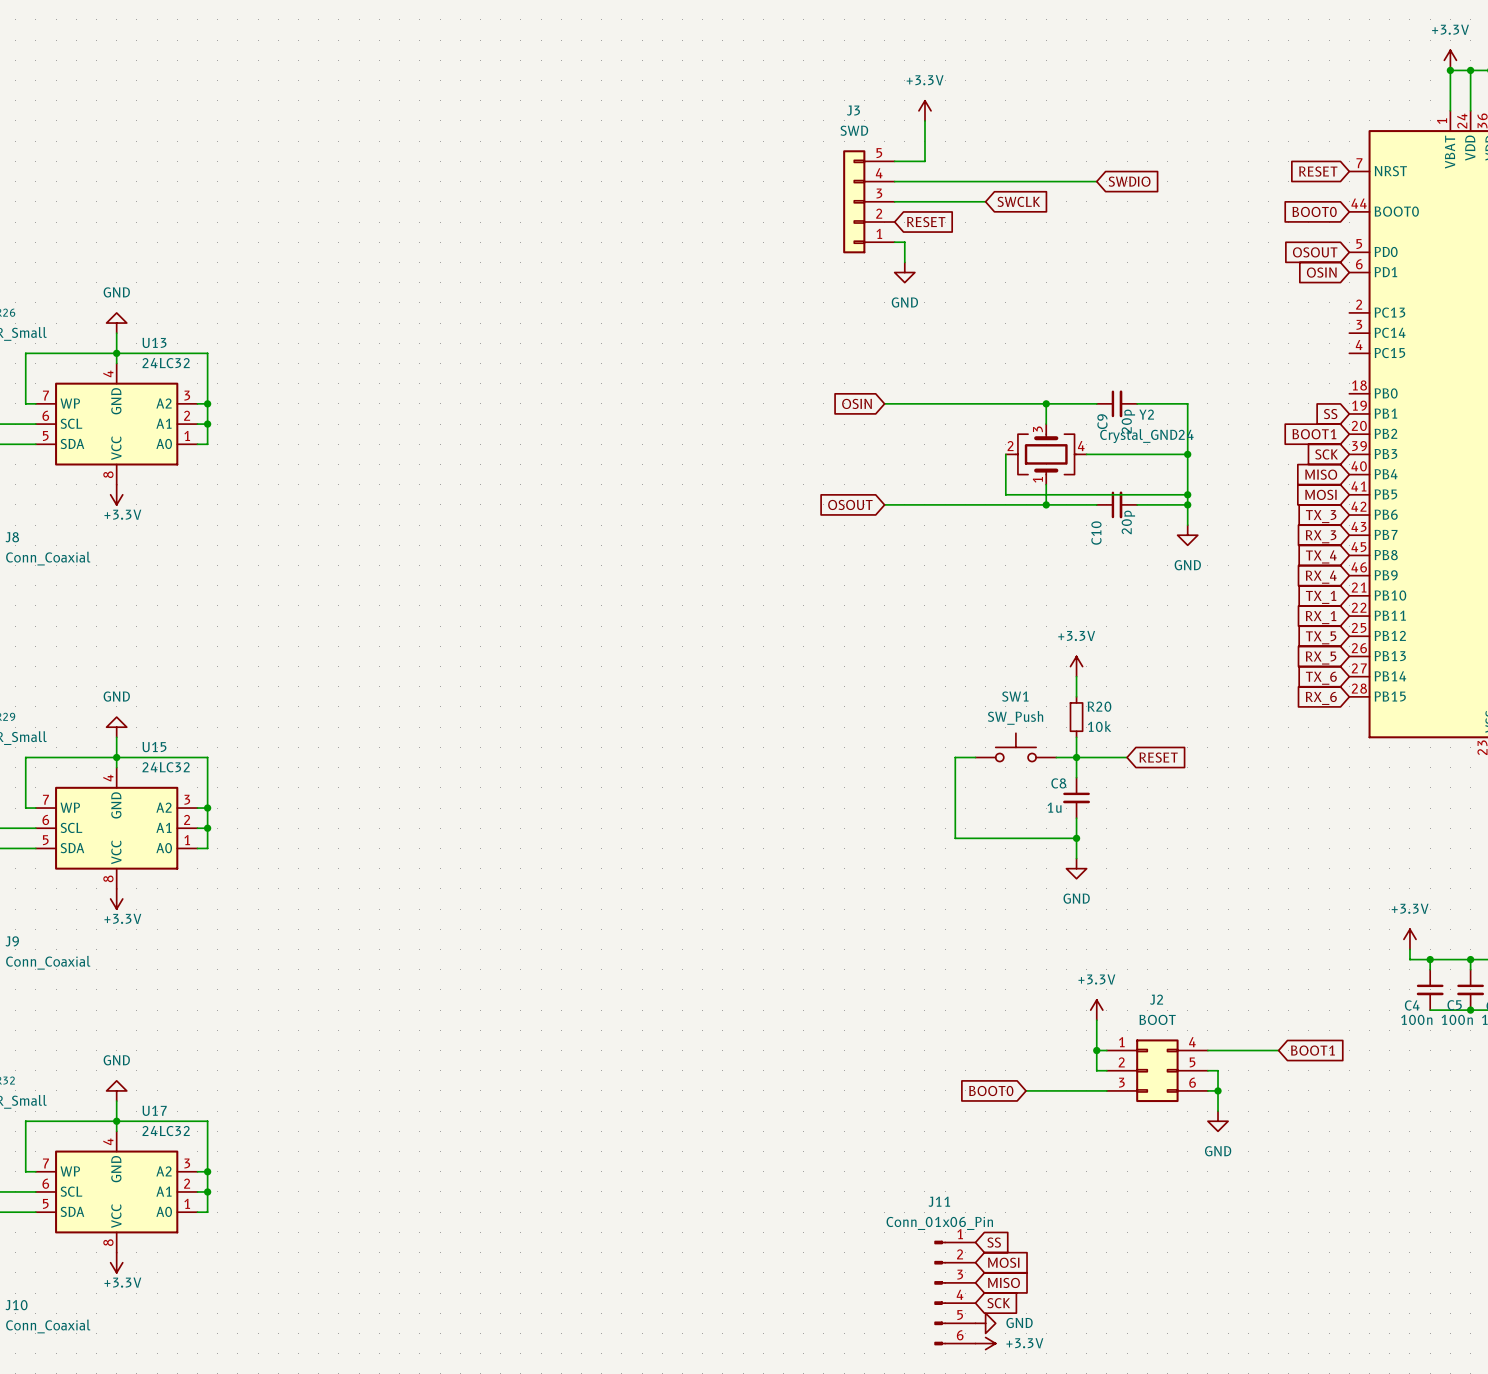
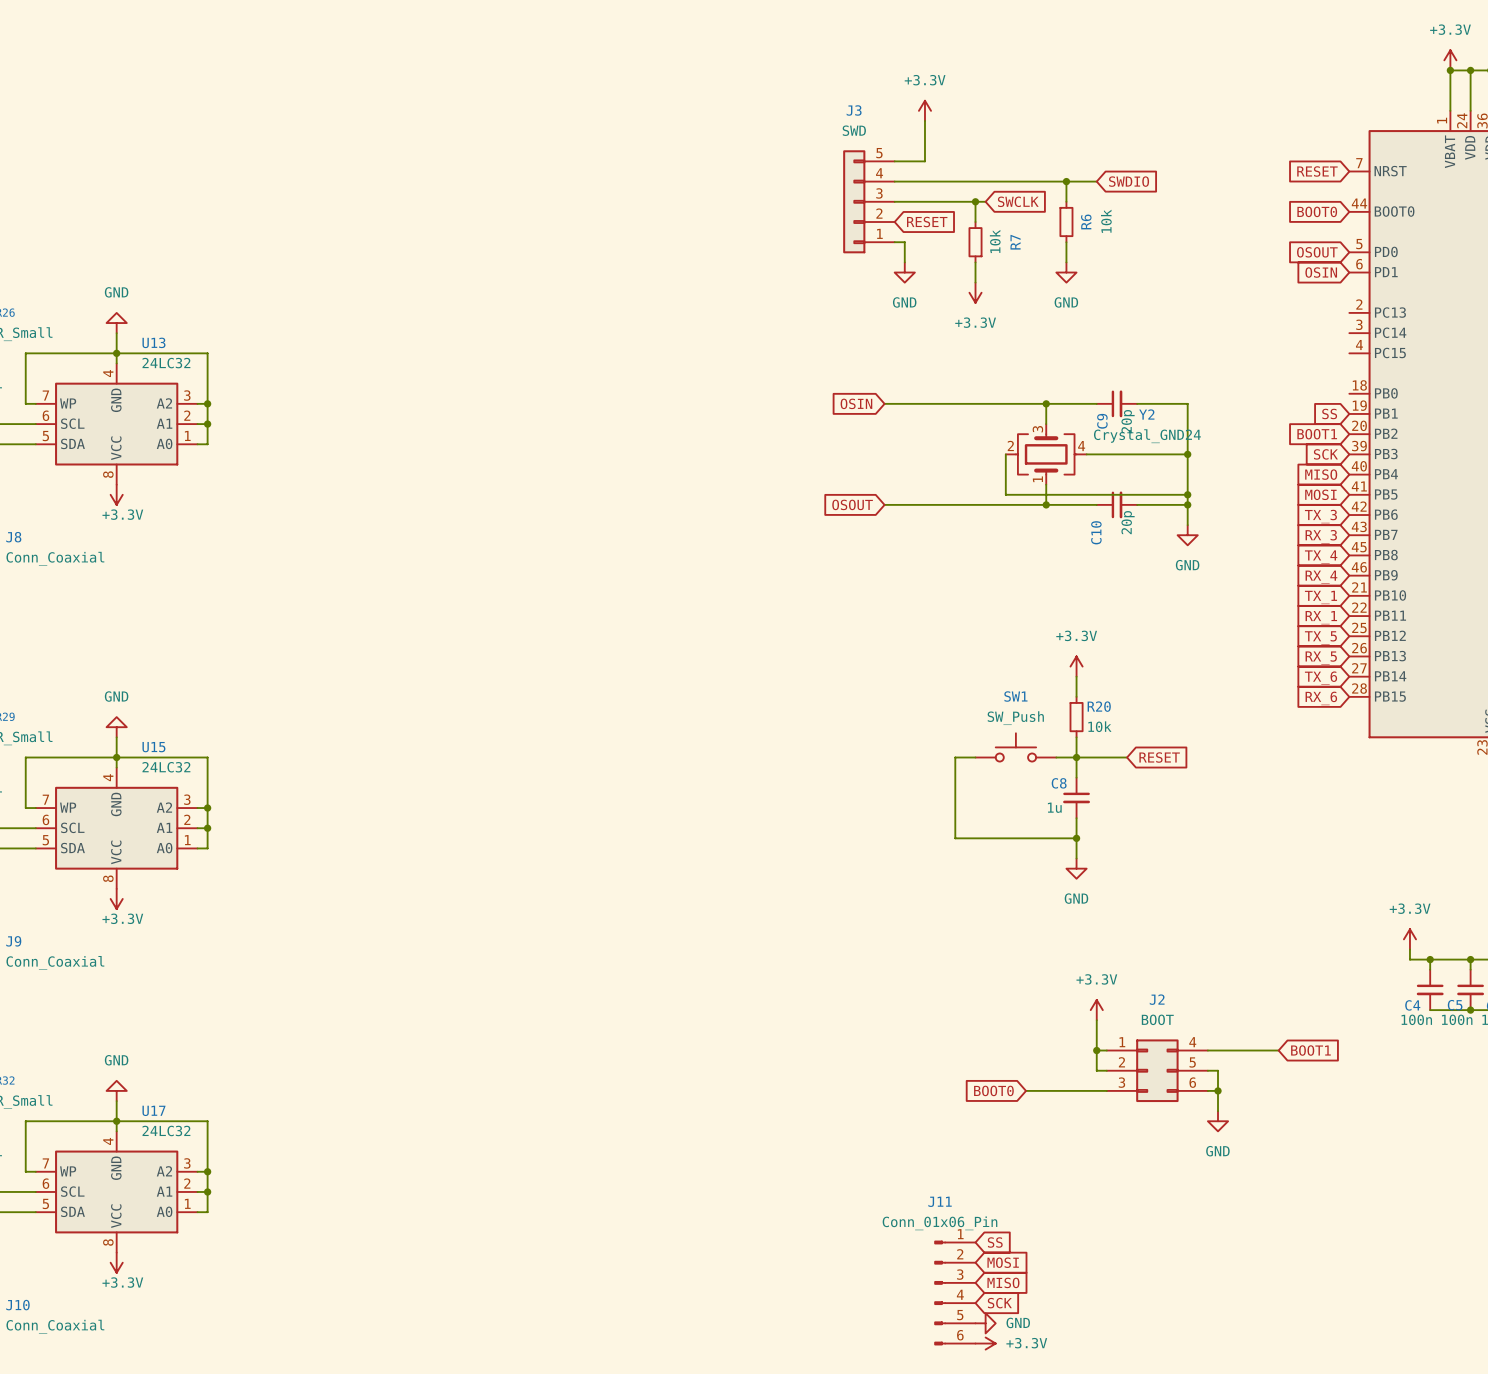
wire: none -> (1066, 181) (1066, 201)
junction: none -> (1066, 181)
wire: none -> (975, 201) (975, 222)
junction: none -> (975, 201)
R6: none -> 10k (1066, 222)
R7: none -> 10k (975, 242)
wire: none -> (1066, 242) (1066, 262)
wire: none -> (975, 262) (975, 282)
power symbol: none -> GND (1066, 272)
power symbol: none -> +3.3V (975, 292)

